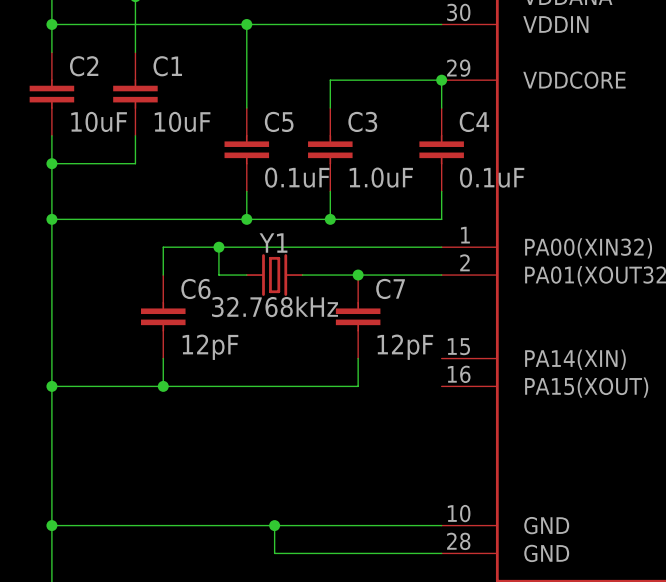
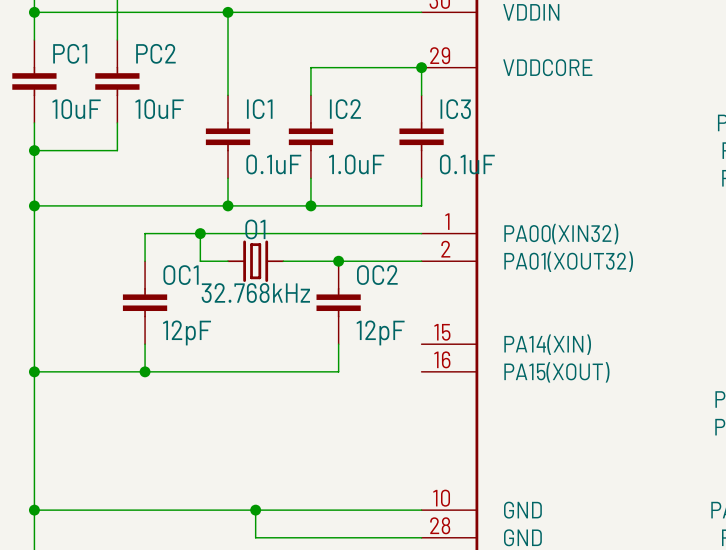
C2 name: C2 (84, 66) -> PC1 (70, 53)
C1 name: C1 (167, 66) -> PC2 (155, 53)
C5 name: C5 (279, 121) -> IC1 (259, 109)
C3 name: C3 (362, 121) -> IC2 (345, 109)
C4 name: C4 (474, 121) -> IC3 (455, 109)
Y1 name: Y1 (273, 243) -> O1 (255, 229)
C6 name: C6 (195, 288) -> OC1 (181, 275)
C7 name: C7 (390, 288) -> OC2 (377, 275)

